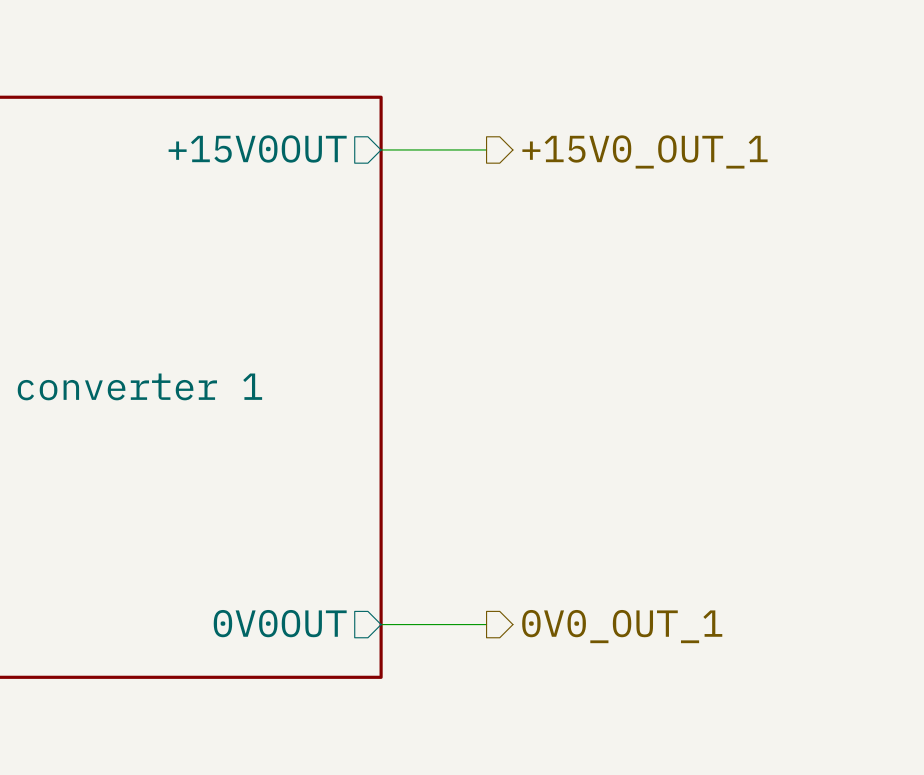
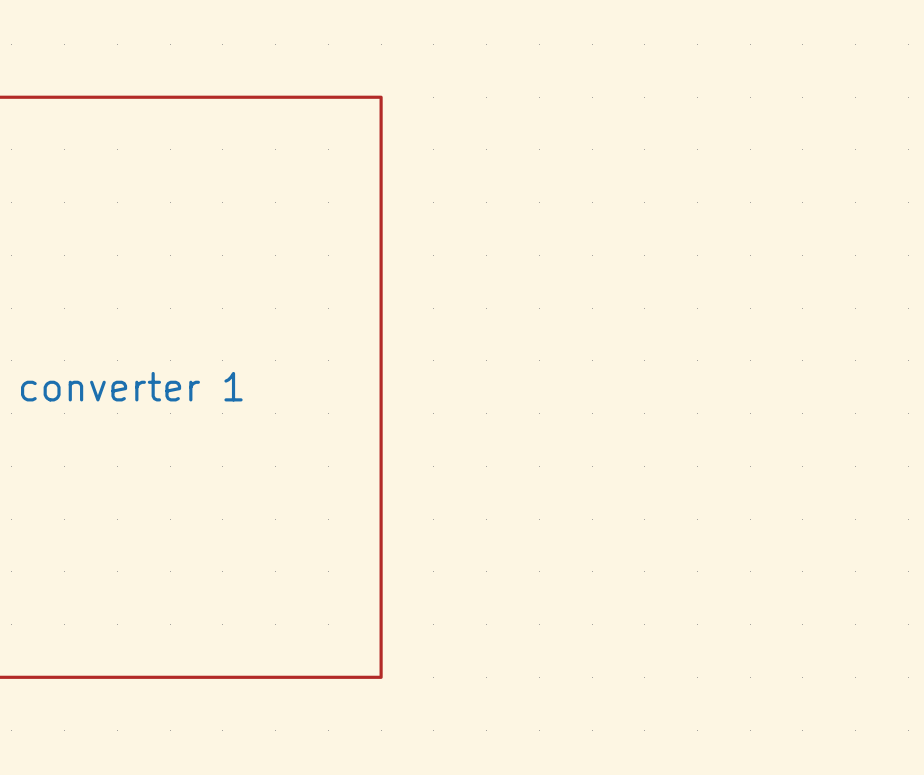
sheet pin: +15V0OUT (257, 148) -> none
wire: (381, 149) (486, 149) -> none
hierarchical label: +15V0_OUT_1 (645, 151) -> none
sheet pin: 0V0OUT (280, 623) -> none
wire: (381, 624) (486, 624) -> none
hierarchical label: 0V0_OUT_1 (622, 626) -> none

